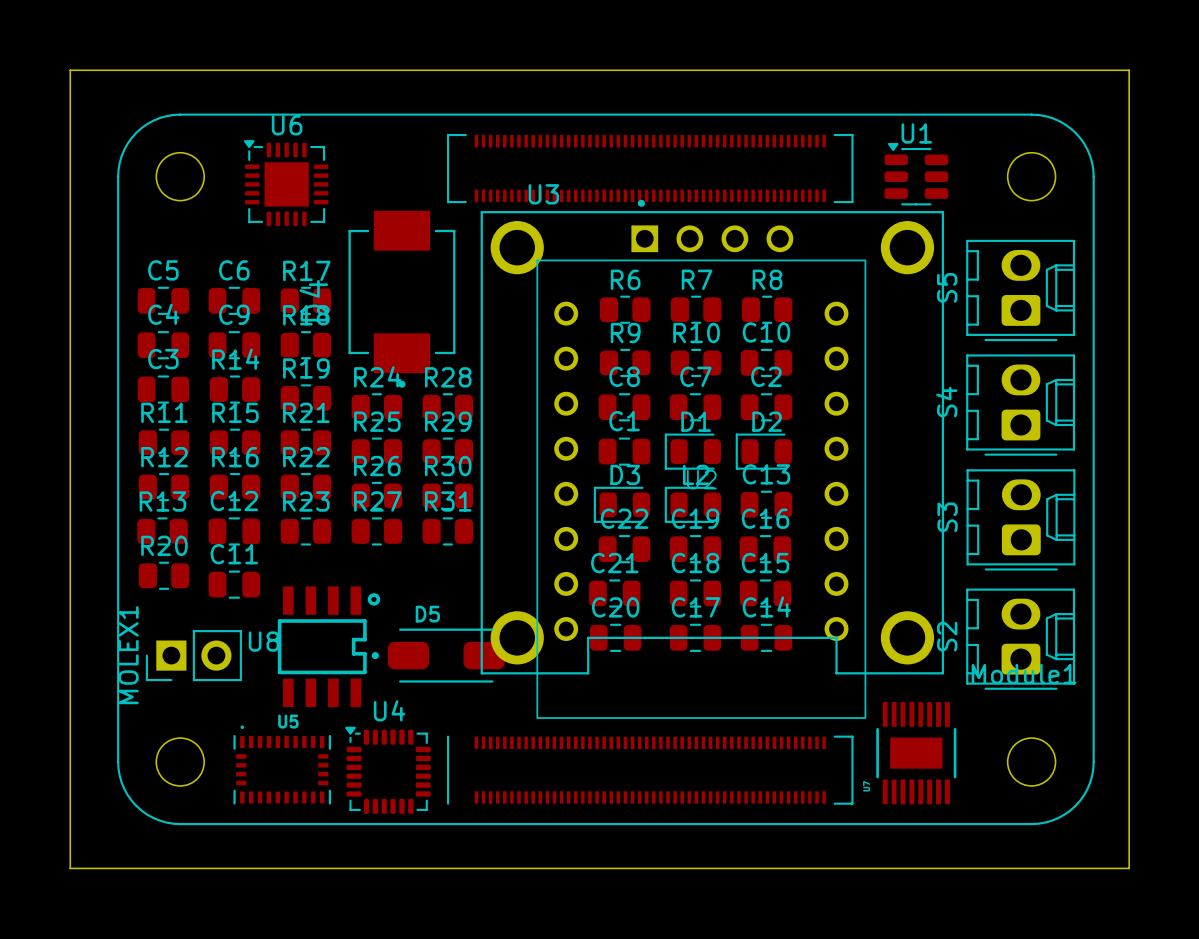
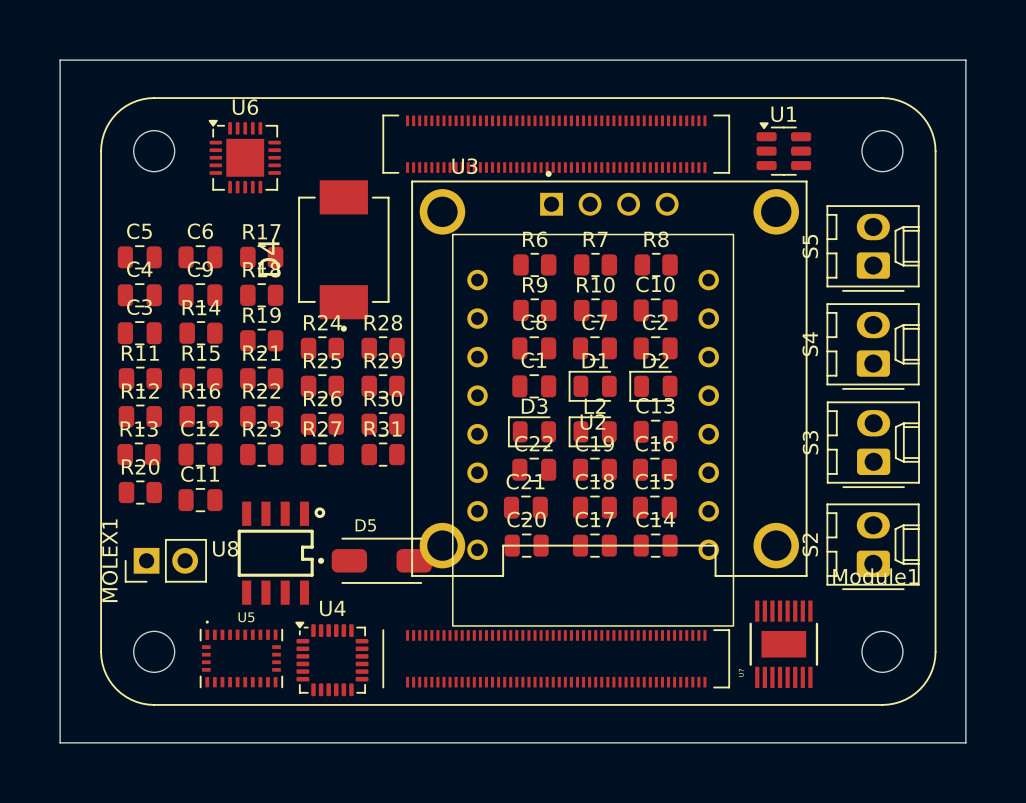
U2 position: (701, 489) -> (593, 430)

